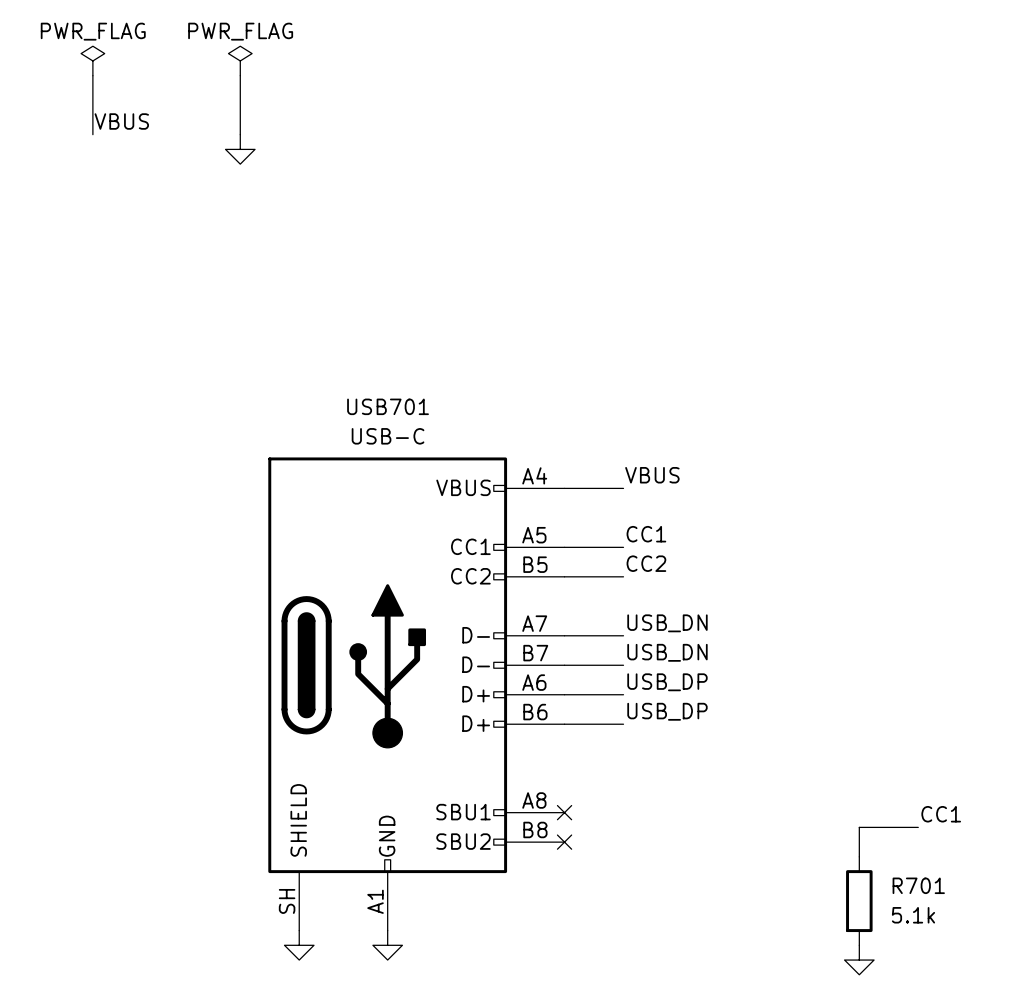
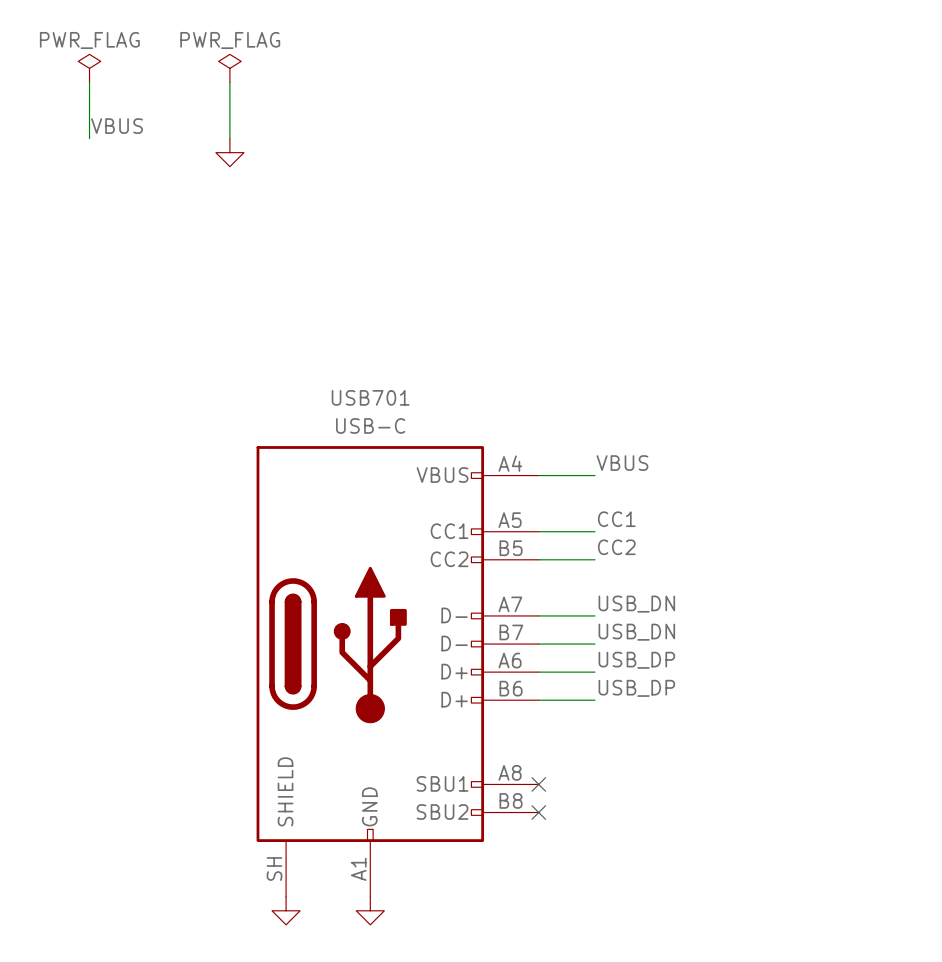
label: CC1 (941, 814) -> none
wire: (918, 827) (859, 827) (859, 856) -> none
R701: 5.1k (859, 901) -> none
power symbol: (859, 960) -> none

